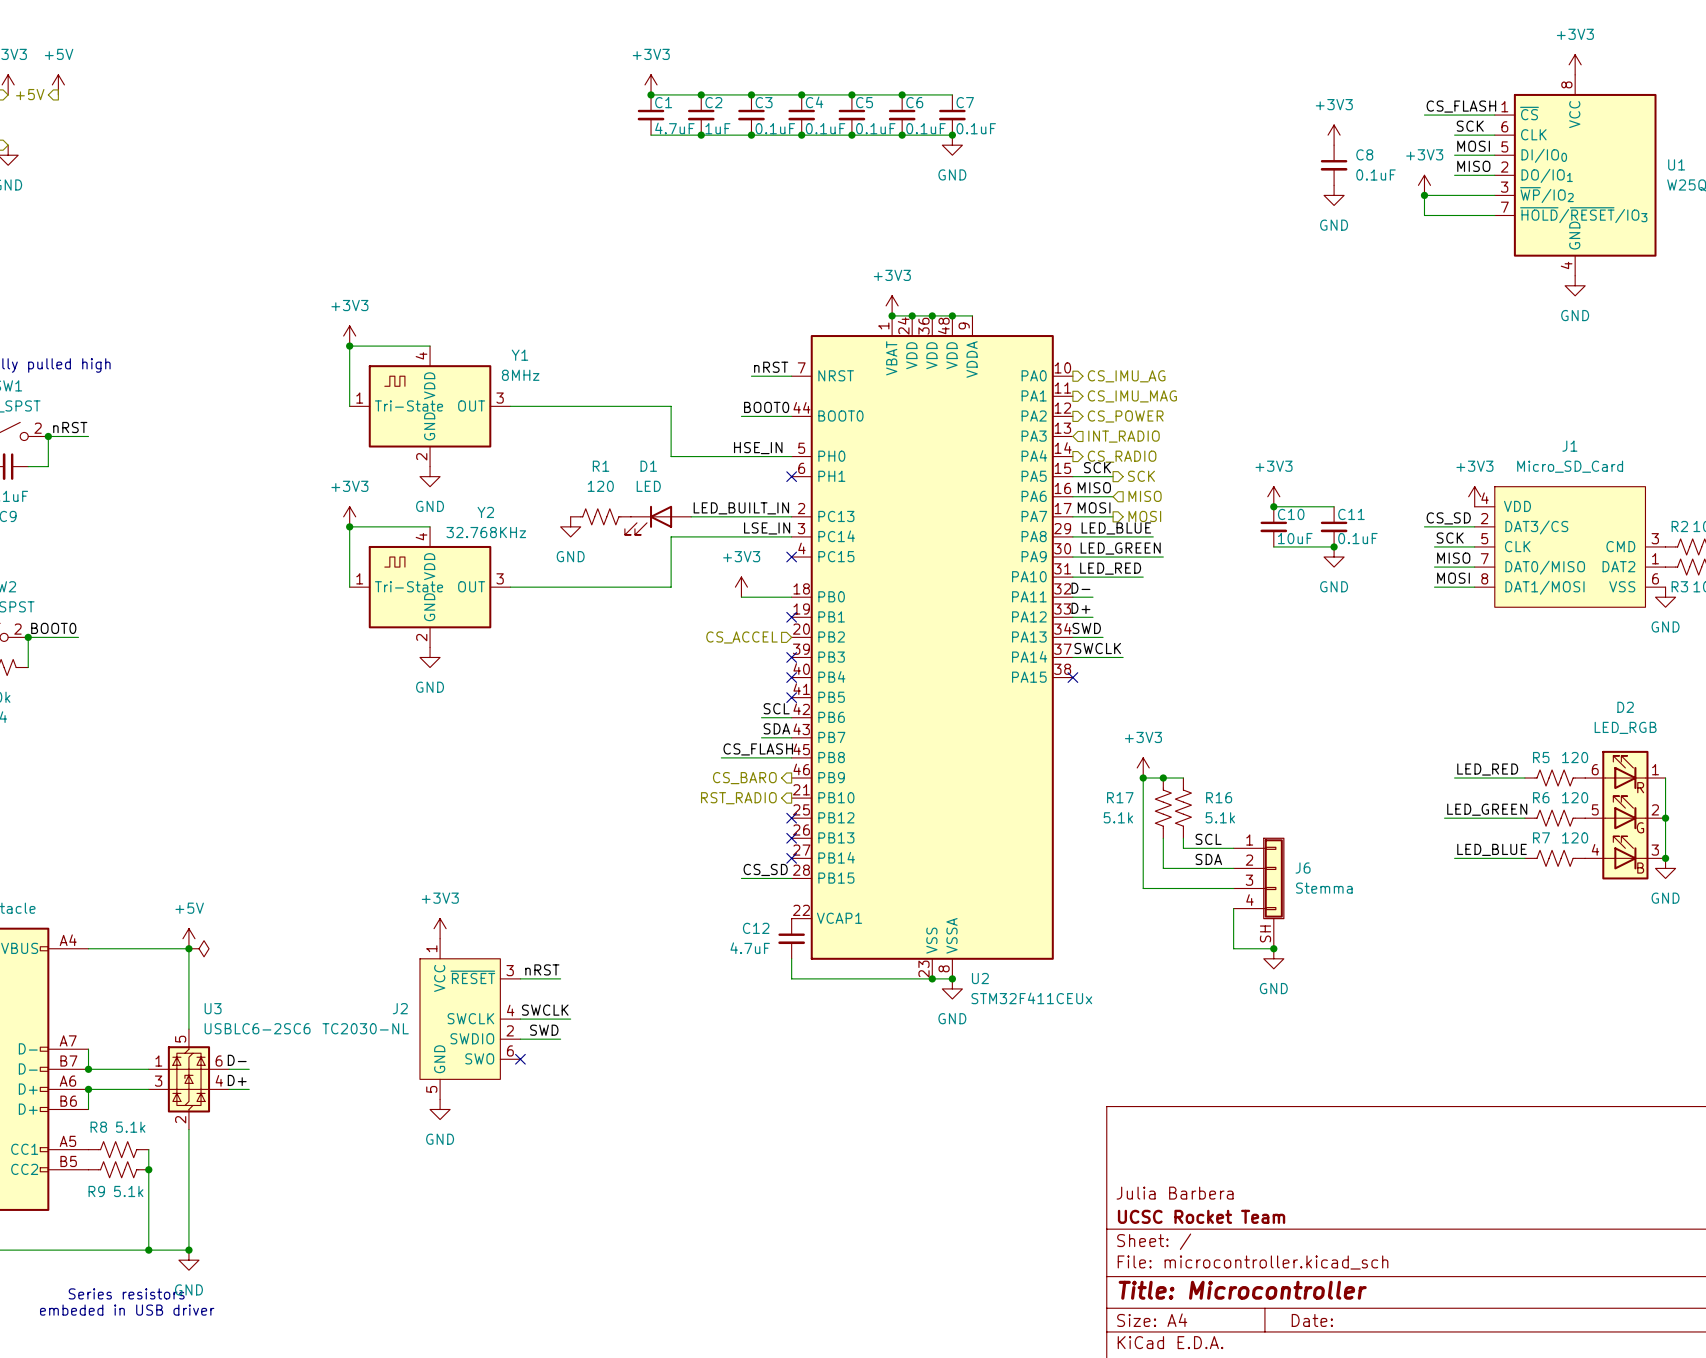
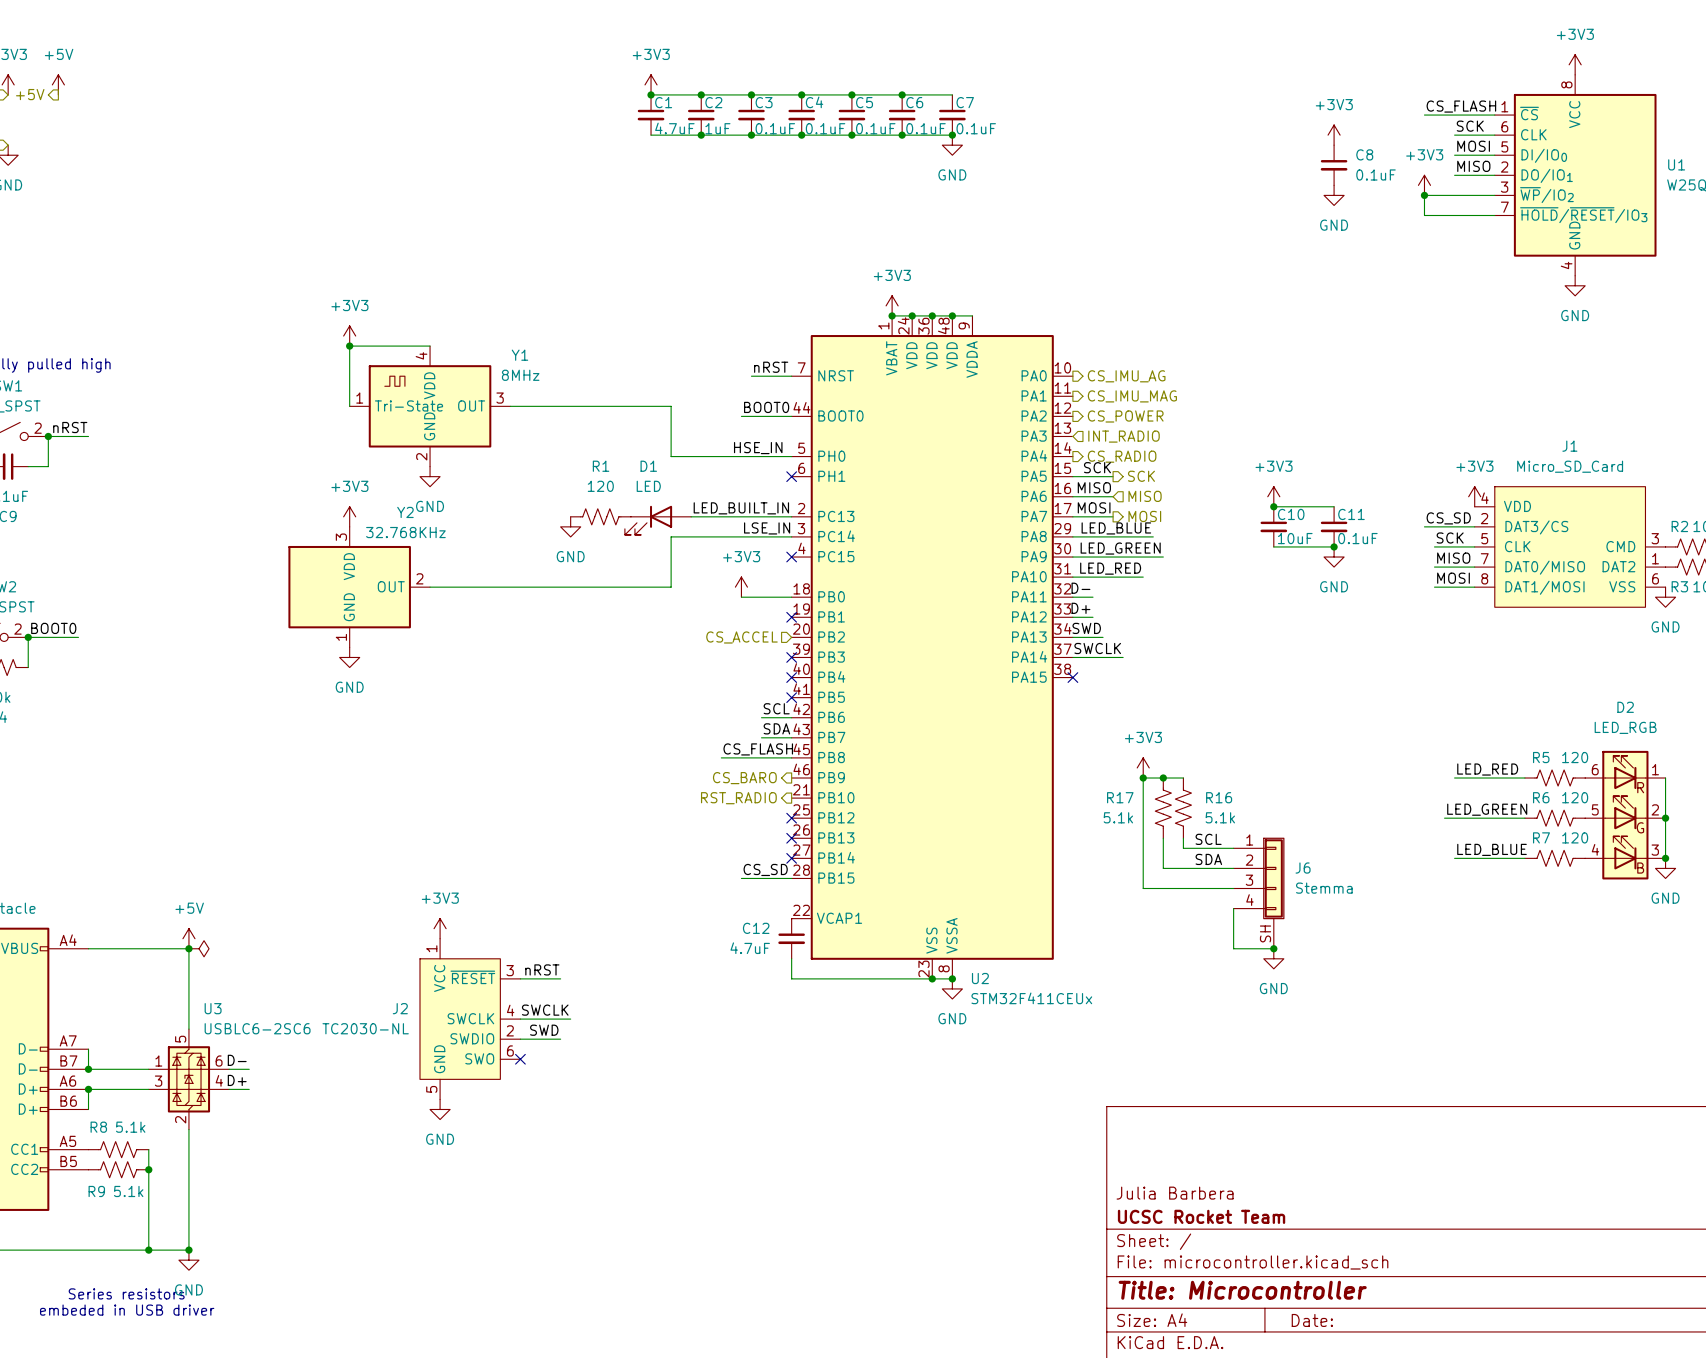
junction: (349, 526) -> none
Y2 symbol: [349, 526, 511, 648] -> [288, 526, 431, 648]
wire: (430, 526) (349, 526) (349, 587) -> none
power symbol position: GND (430, 657) -> GND (349, 657)

